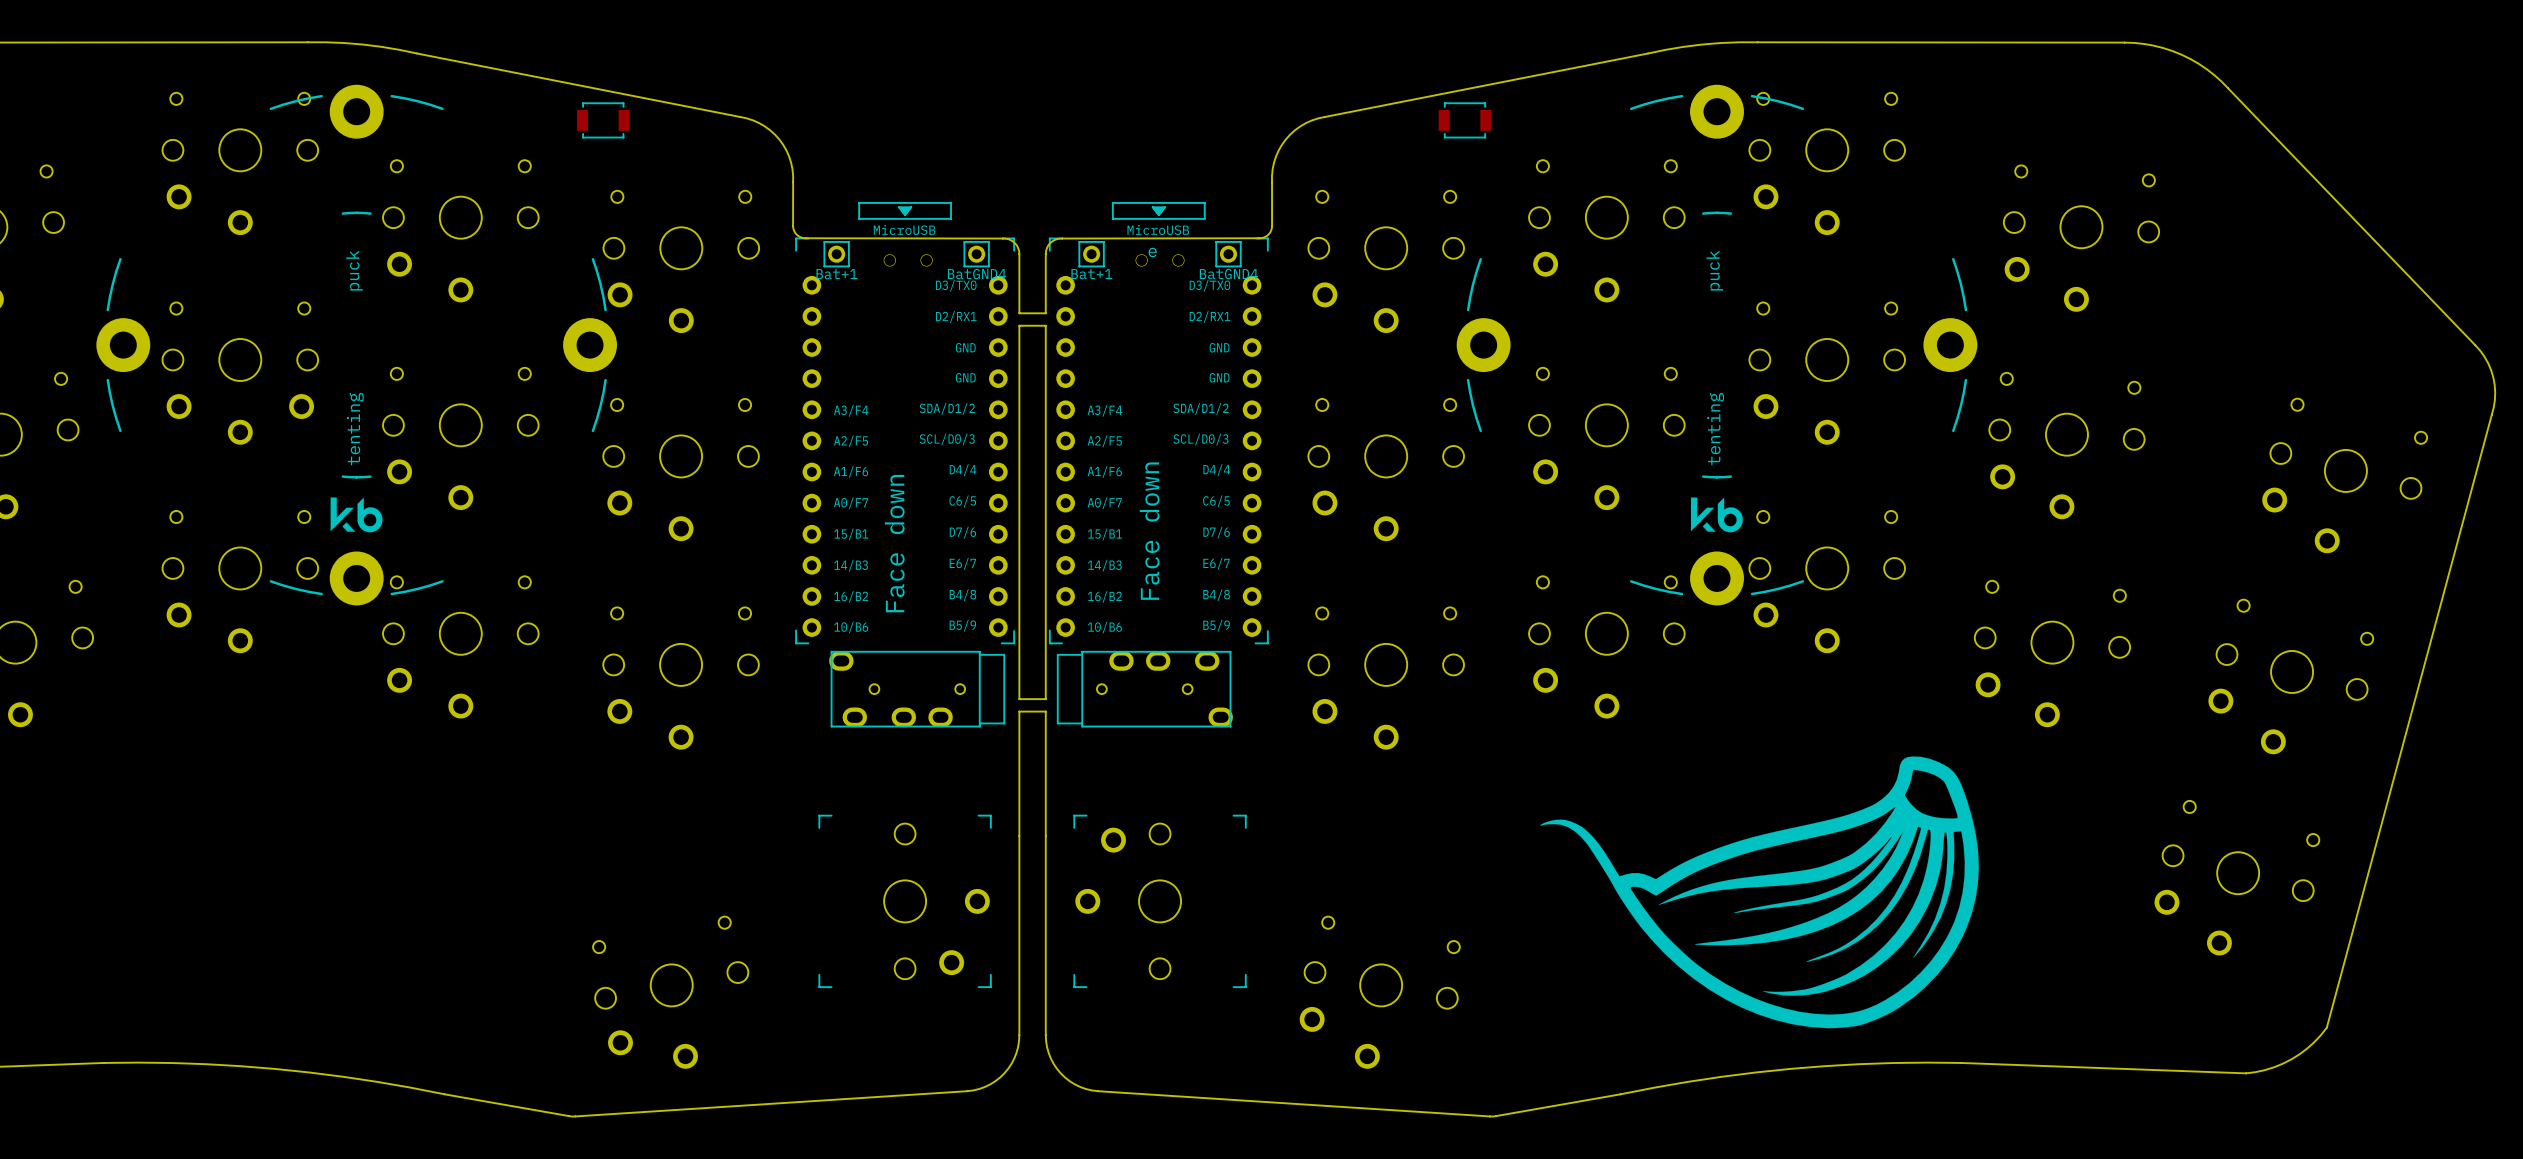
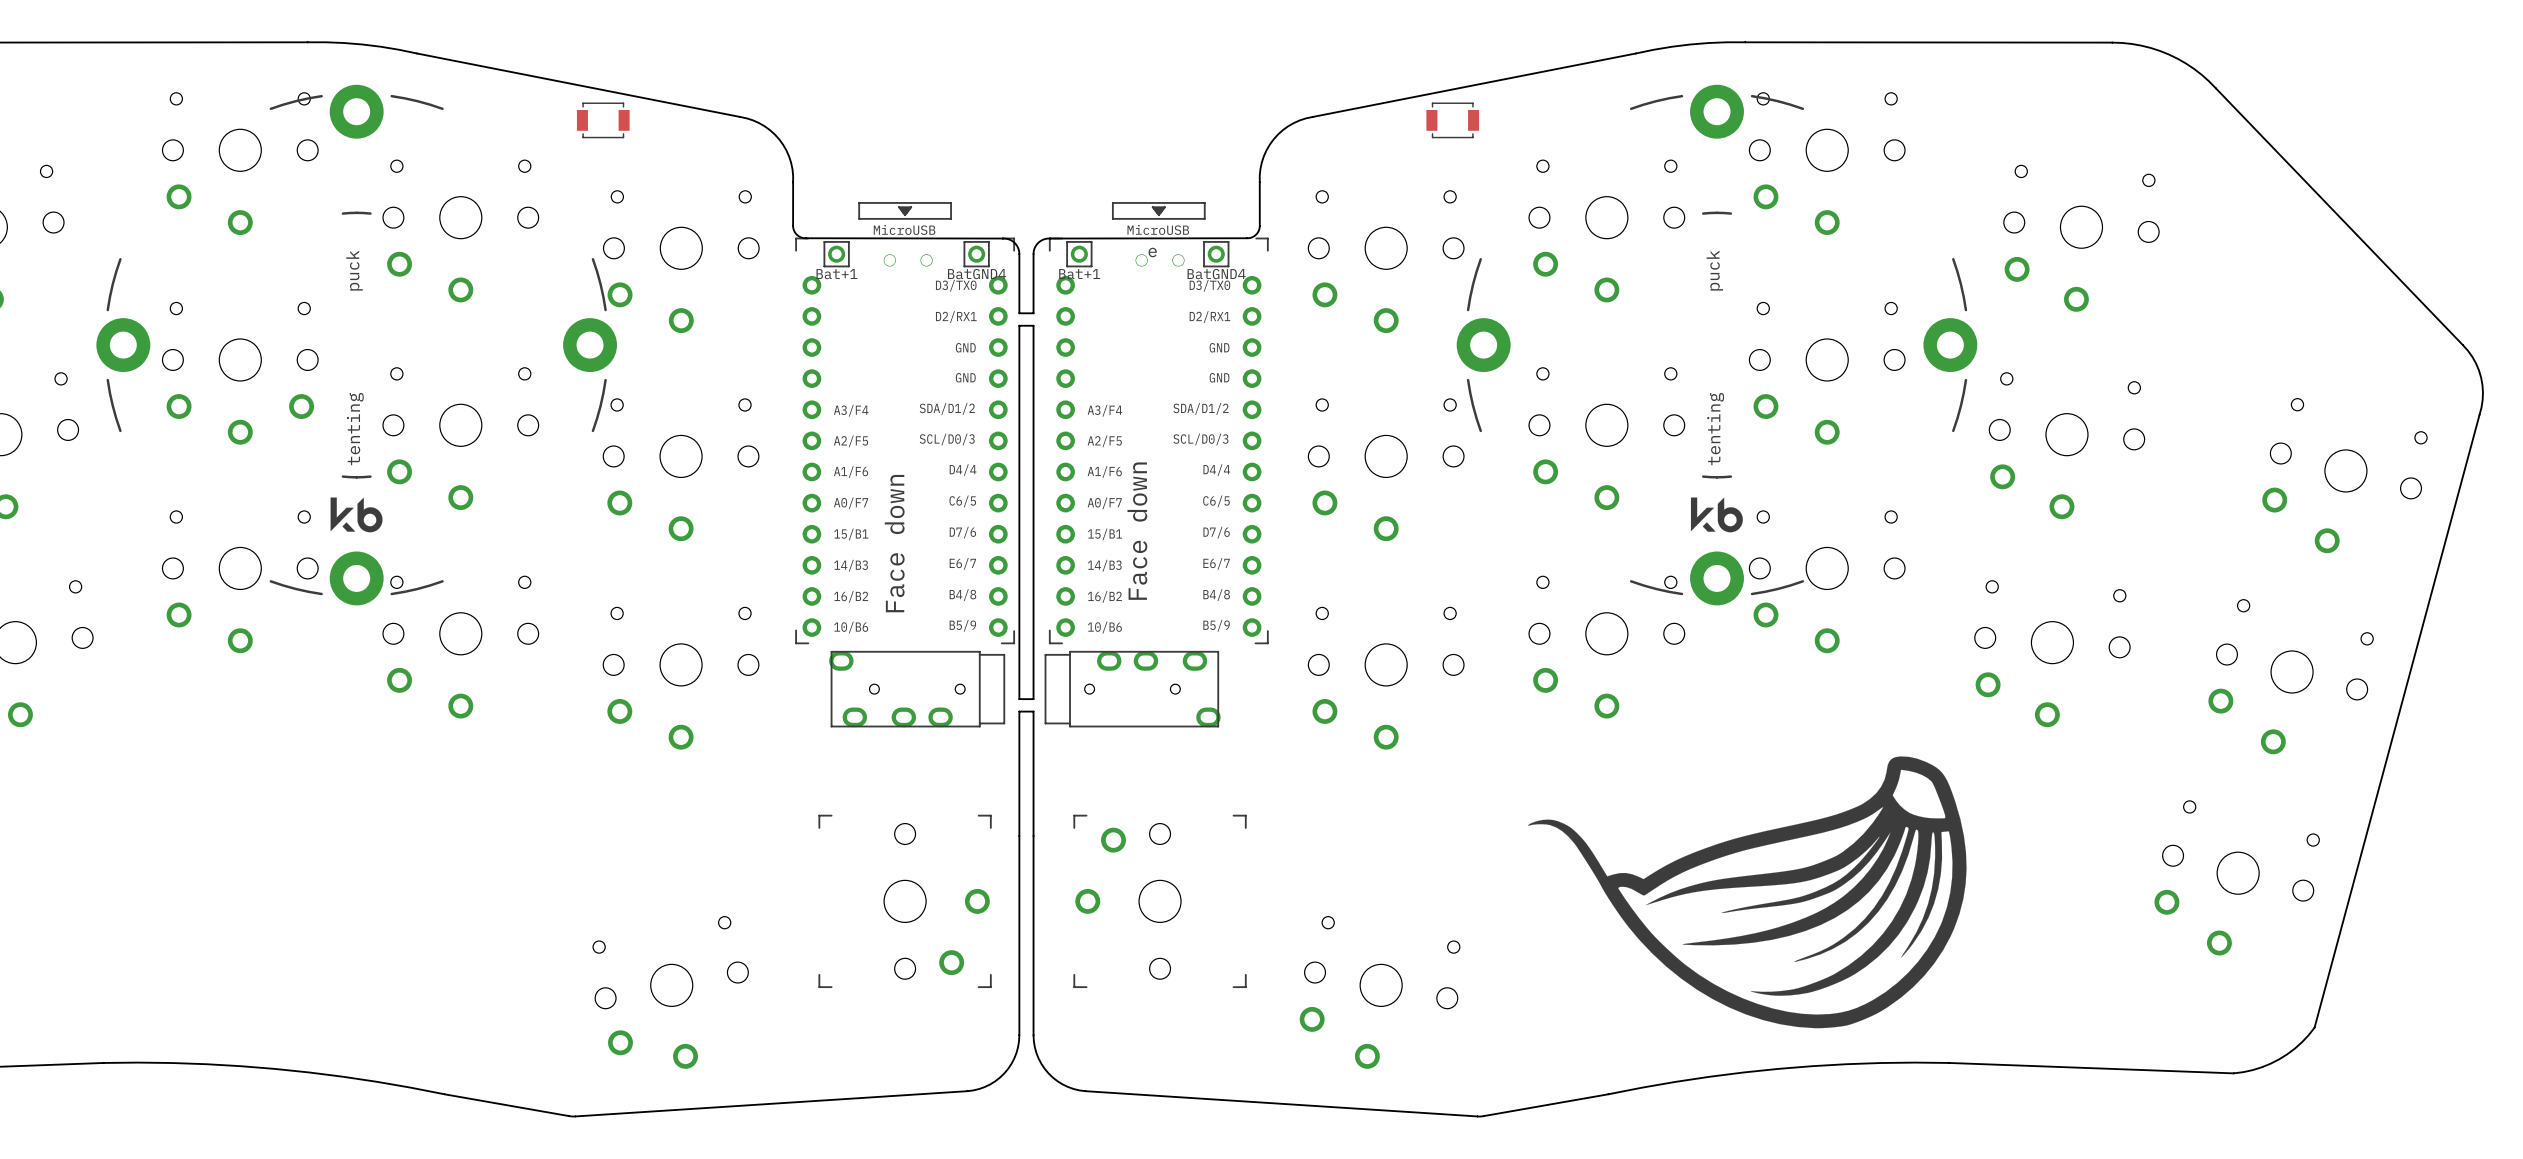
board edge: (1757, 42) (1720, 43) (1666, 49) (1312, 120) (1290, 134) (1276, 156) (1271, 175) (1270, 231) (1263, 237) (1246, 238) -> (1757, 42) (1708, 43) (1653, 49) (1299, 120) (1277, 134) (1266, 150) (1259, 175) (1259, 228) (1254, 235) (1246, 238)
board edge: (2112, 42) (2144, 43) (2172, 50) (2198, 63) (2221, 81) (2475, 345) (2488, 363) (2494, 385) (2493, 407) (2326, 1027) (2314, 1042) (2291, 1059) (2274, 1067) (2246, 1073) (1961, 1062) (1892, 1063) (1824, 1066) (1756, 1072) (1688, 1081) (1492, 1116) (1086, 1089) (1074, 1084) (1060, 1073) (1050, 1058) (1046, 1041) (1045, 711) (1033, 711) -> (2112, 42) (2141, 45) (2169, 54) (2194, 69) (2209, 81) (2462, 345) (2476, 363) (2482, 385) (2481, 407) (2314, 1027) (2302, 1042) (2279, 1059) (2261, 1067) (2233, 1073) (1949, 1062) (1880, 1063) (1812, 1066) (1743, 1072) (1675, 1081) (1480, 1116) (1073, 1089) (1062, 1084) (1048, 1073) (1038, 1058) (1033, 1041) (1033, 711)
part position: (1464, 120) -> (1452, 120)
board edge: (1062, 238) (1052, 241) (1046, 250) (1045, 313) (1033, 313) -> (1062, 238) (1042, 239) (1034, 248) (1033, 313)
Bat+1 position: (1091, 254) -> (1079, 254)
BatGND4 position: (1228, 254) -> (1216, 254)
board edge: (1033, 325) (1045, 325) (1045, 699) (1033, 699) -> (1033, 325) (1033, 699)
text position: Face down (1149, 531) -> Face down (1137, 531)
part position: (1144, 689) -> (1132, 689)
drawing position: (1759, 892) -> (1747, 892)

